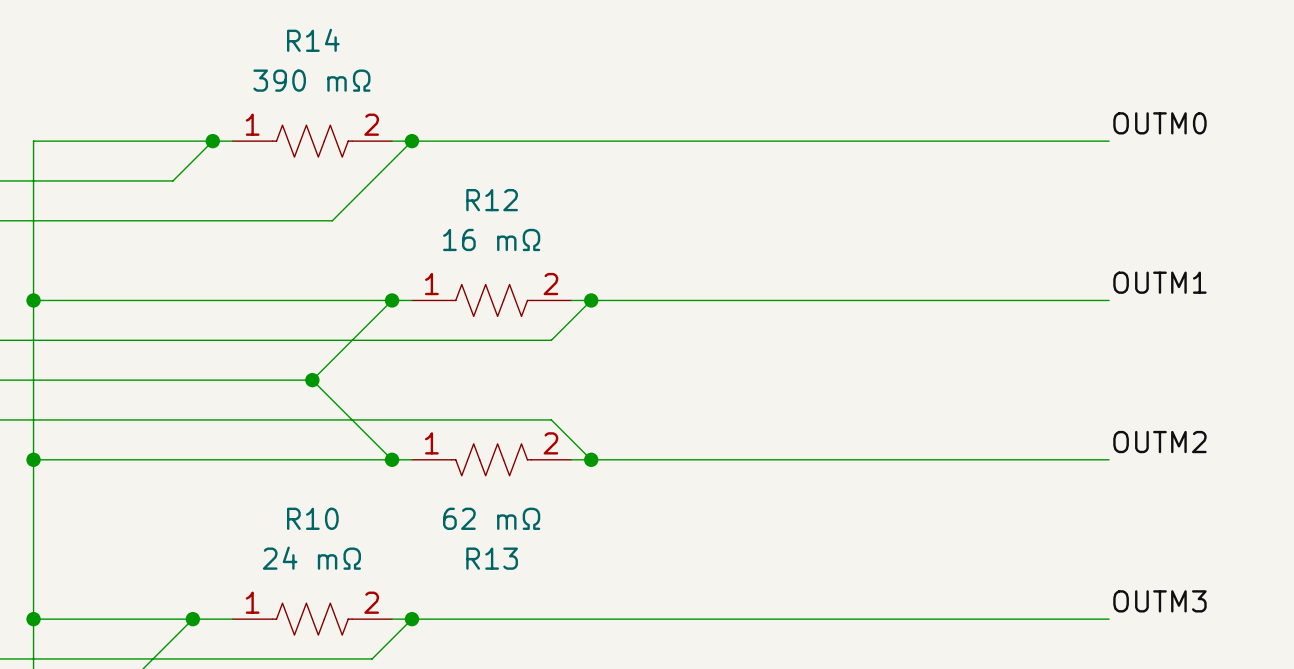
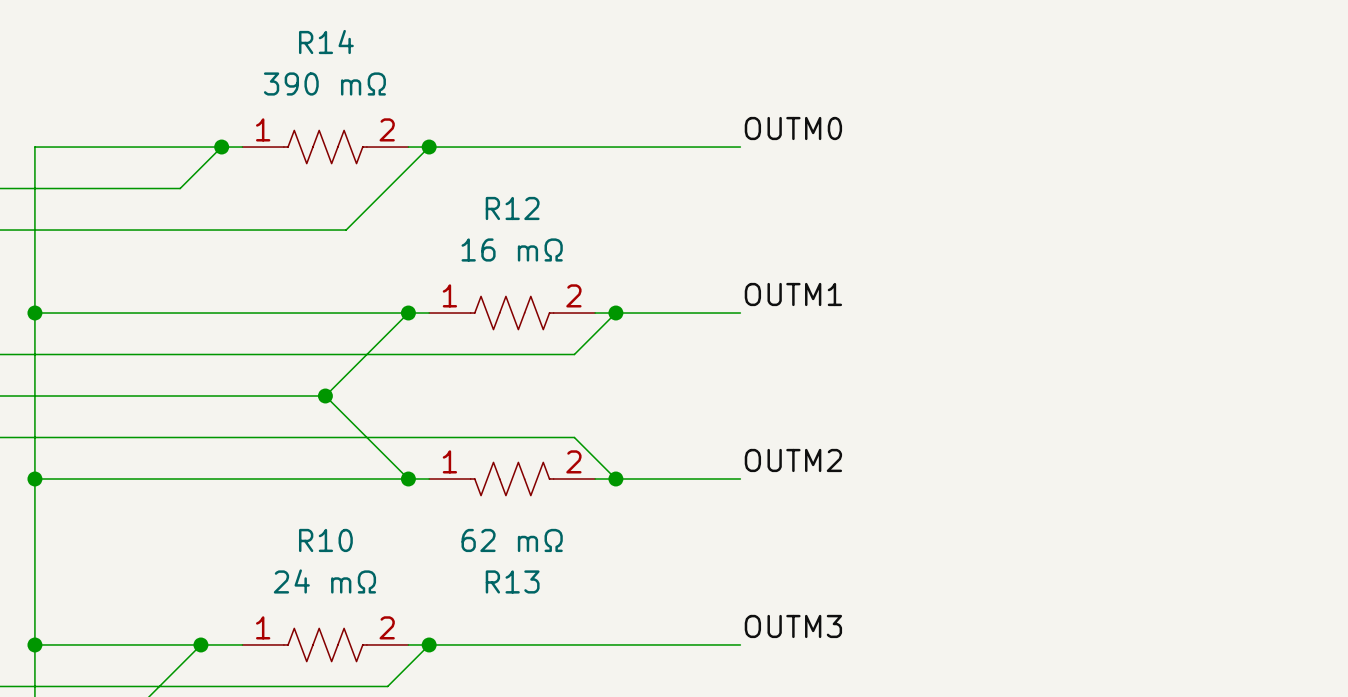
label: none -> OUTM0 (793, 128)
label: OUTM0 (1159, 123) -> none
wire: (710, 141) (1109, 141) -> none
label: none -> OUTM1 (793, 294)
label: OUTM1 (1159, 282) -> none
wire: (710, 300) (1109, 300) -> none
label: none -> OUTM2 (793, 460)
label: OUTM2 (1159, 442) -> none
wire: (710, 459) (1109, 459) -> none
label: none -> OUTM3 (793, 626)
label: OUTM3 (1159, 601) -> none
wire: (710, 619) (1109, 619) -> none

